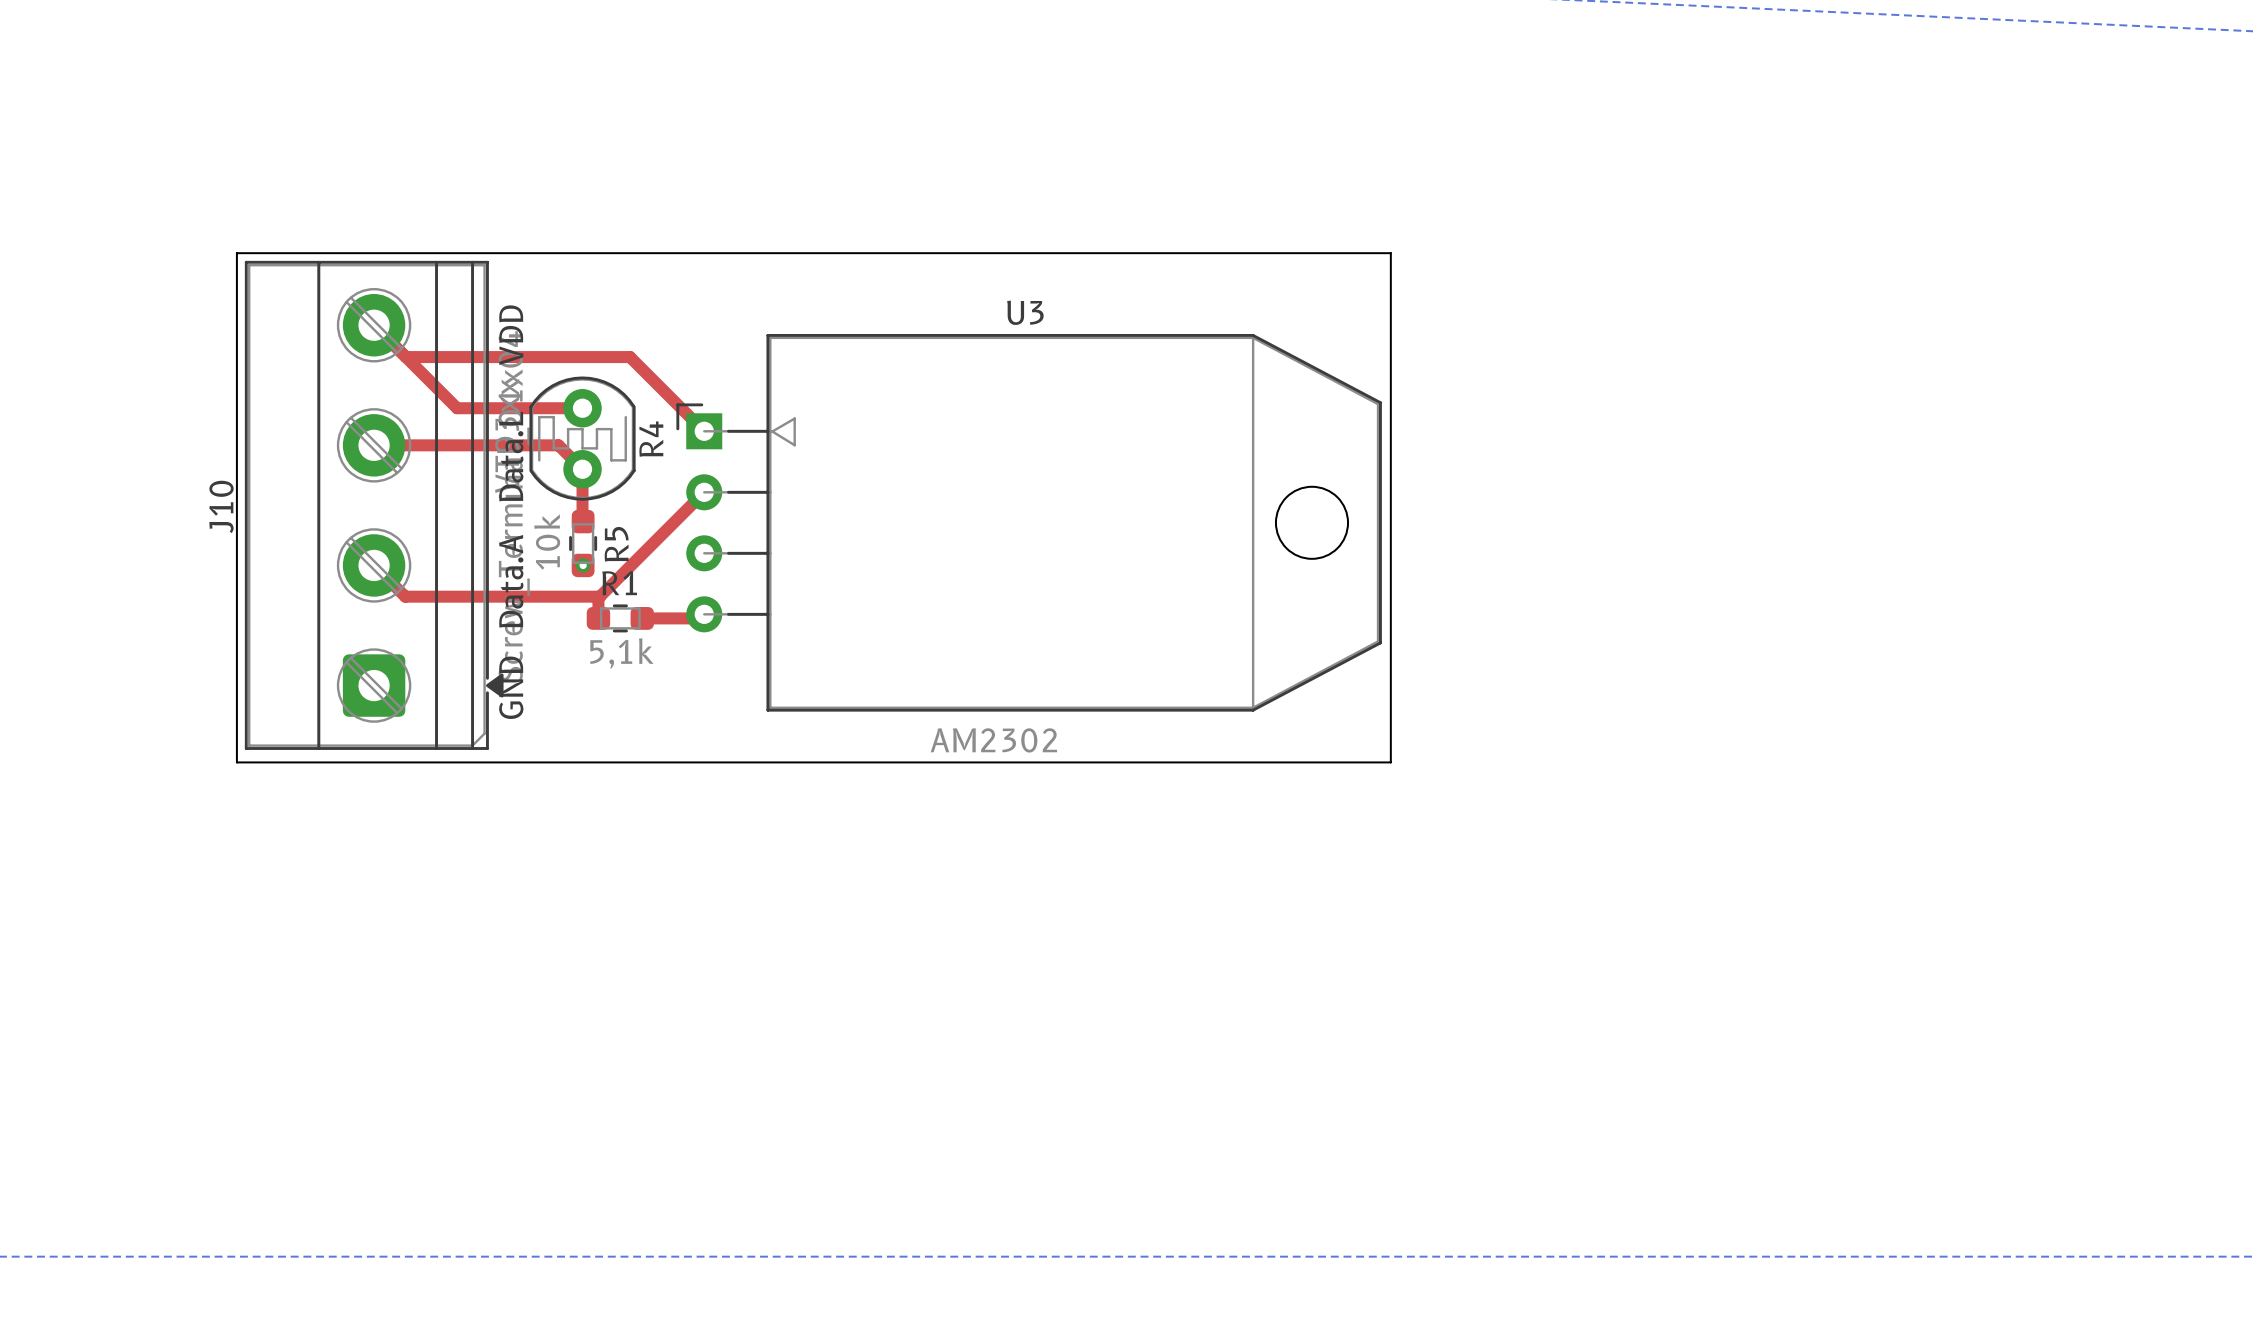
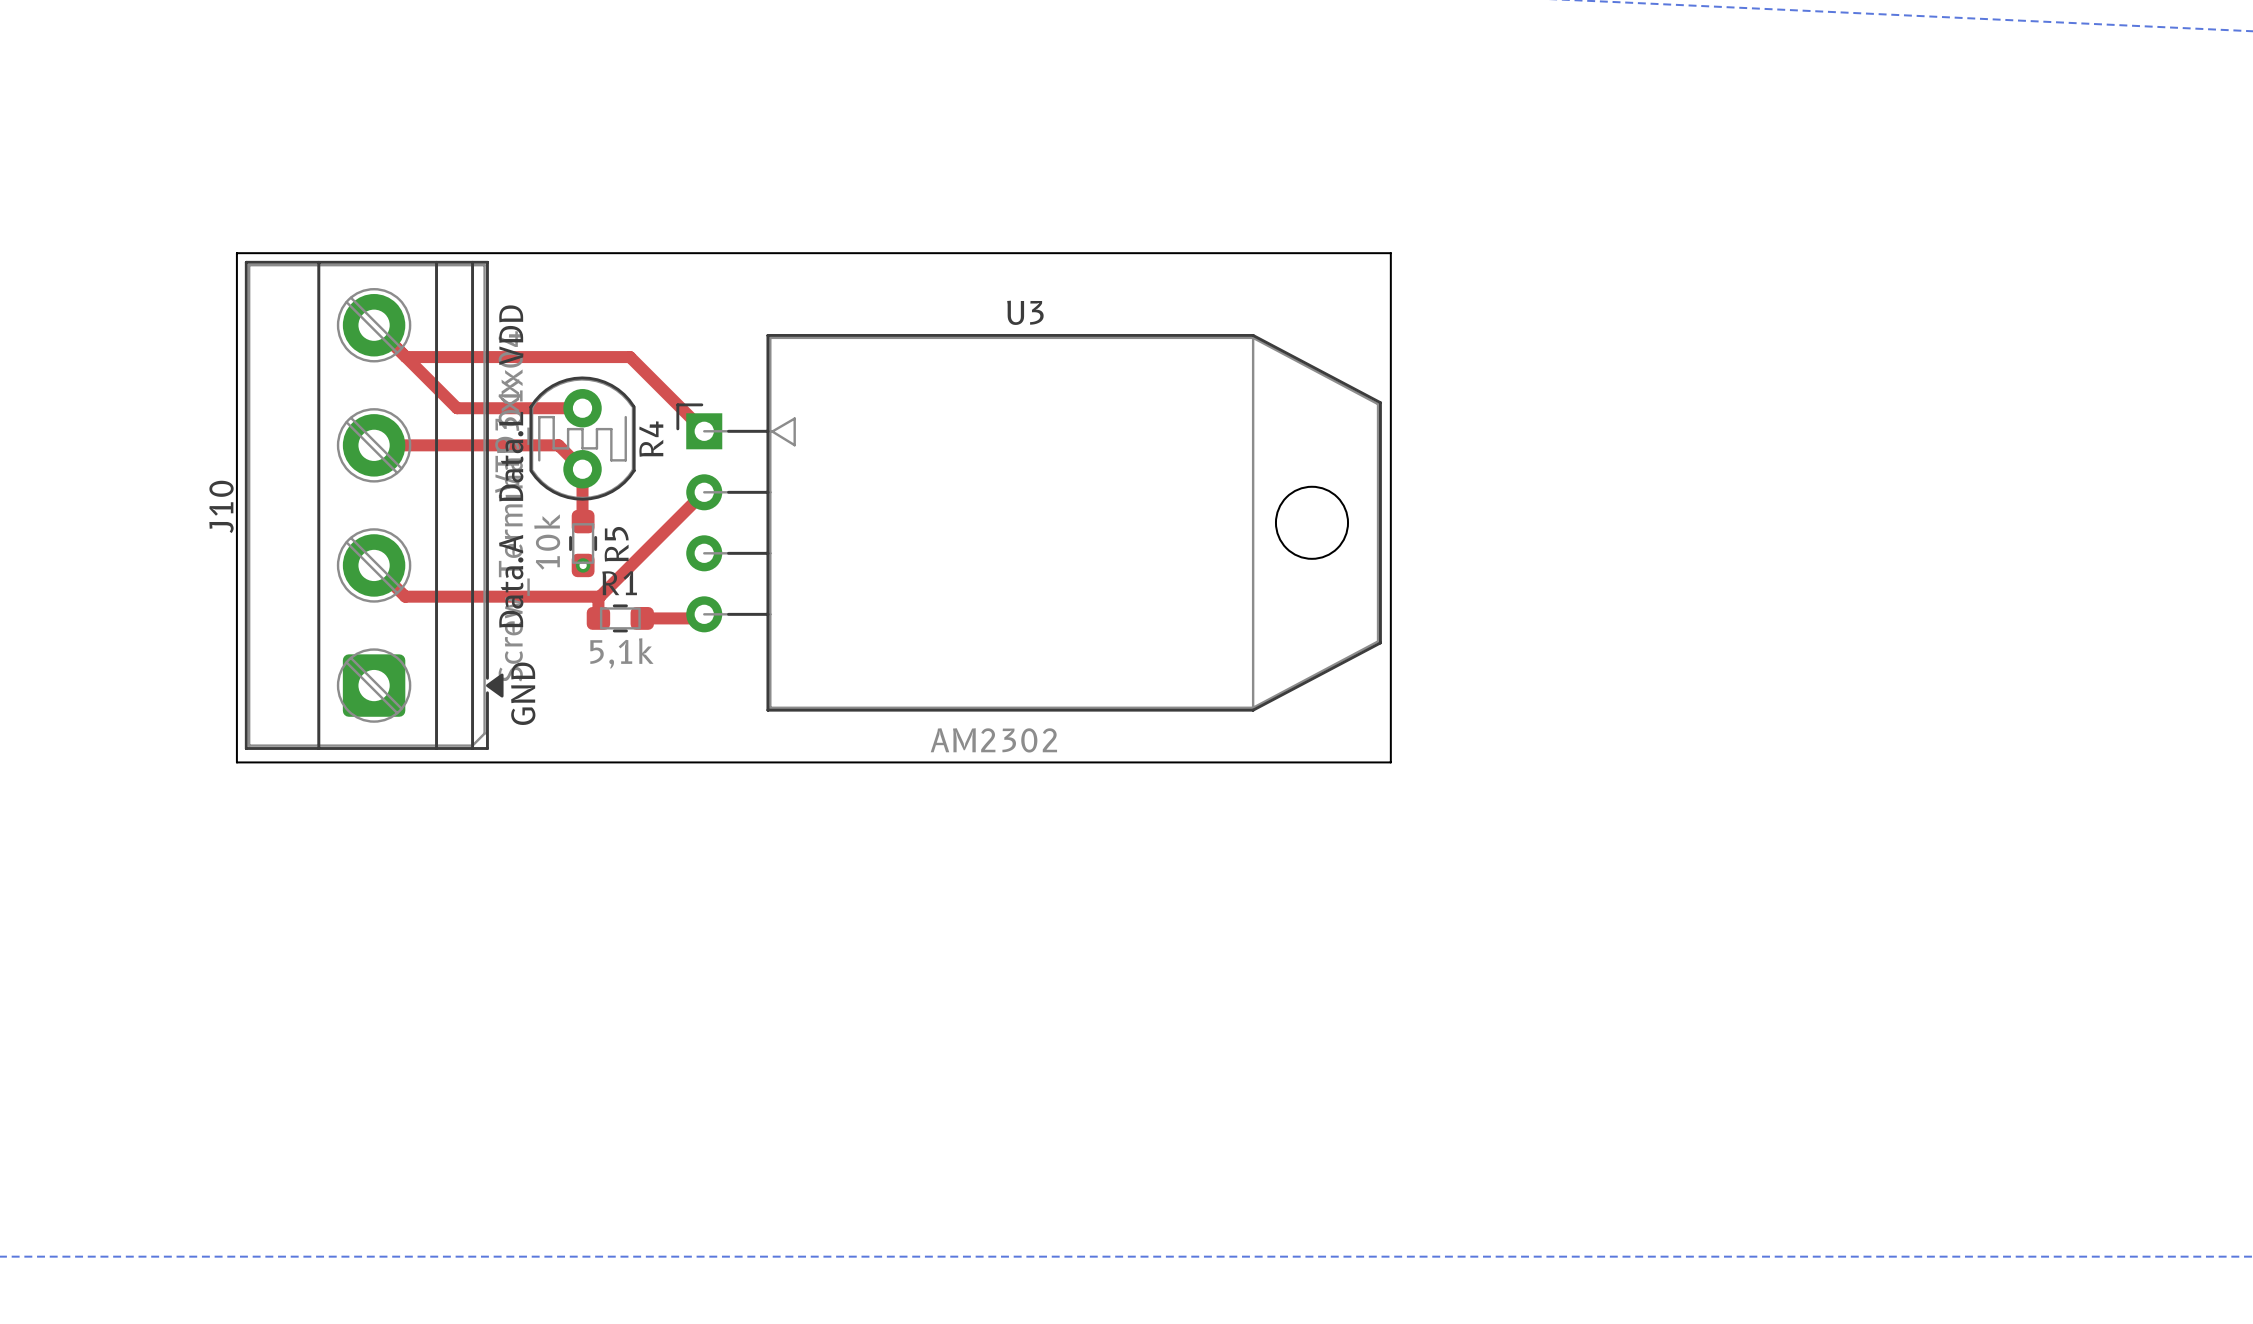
text position: GND (511, 687) -> GND (523, 693)

